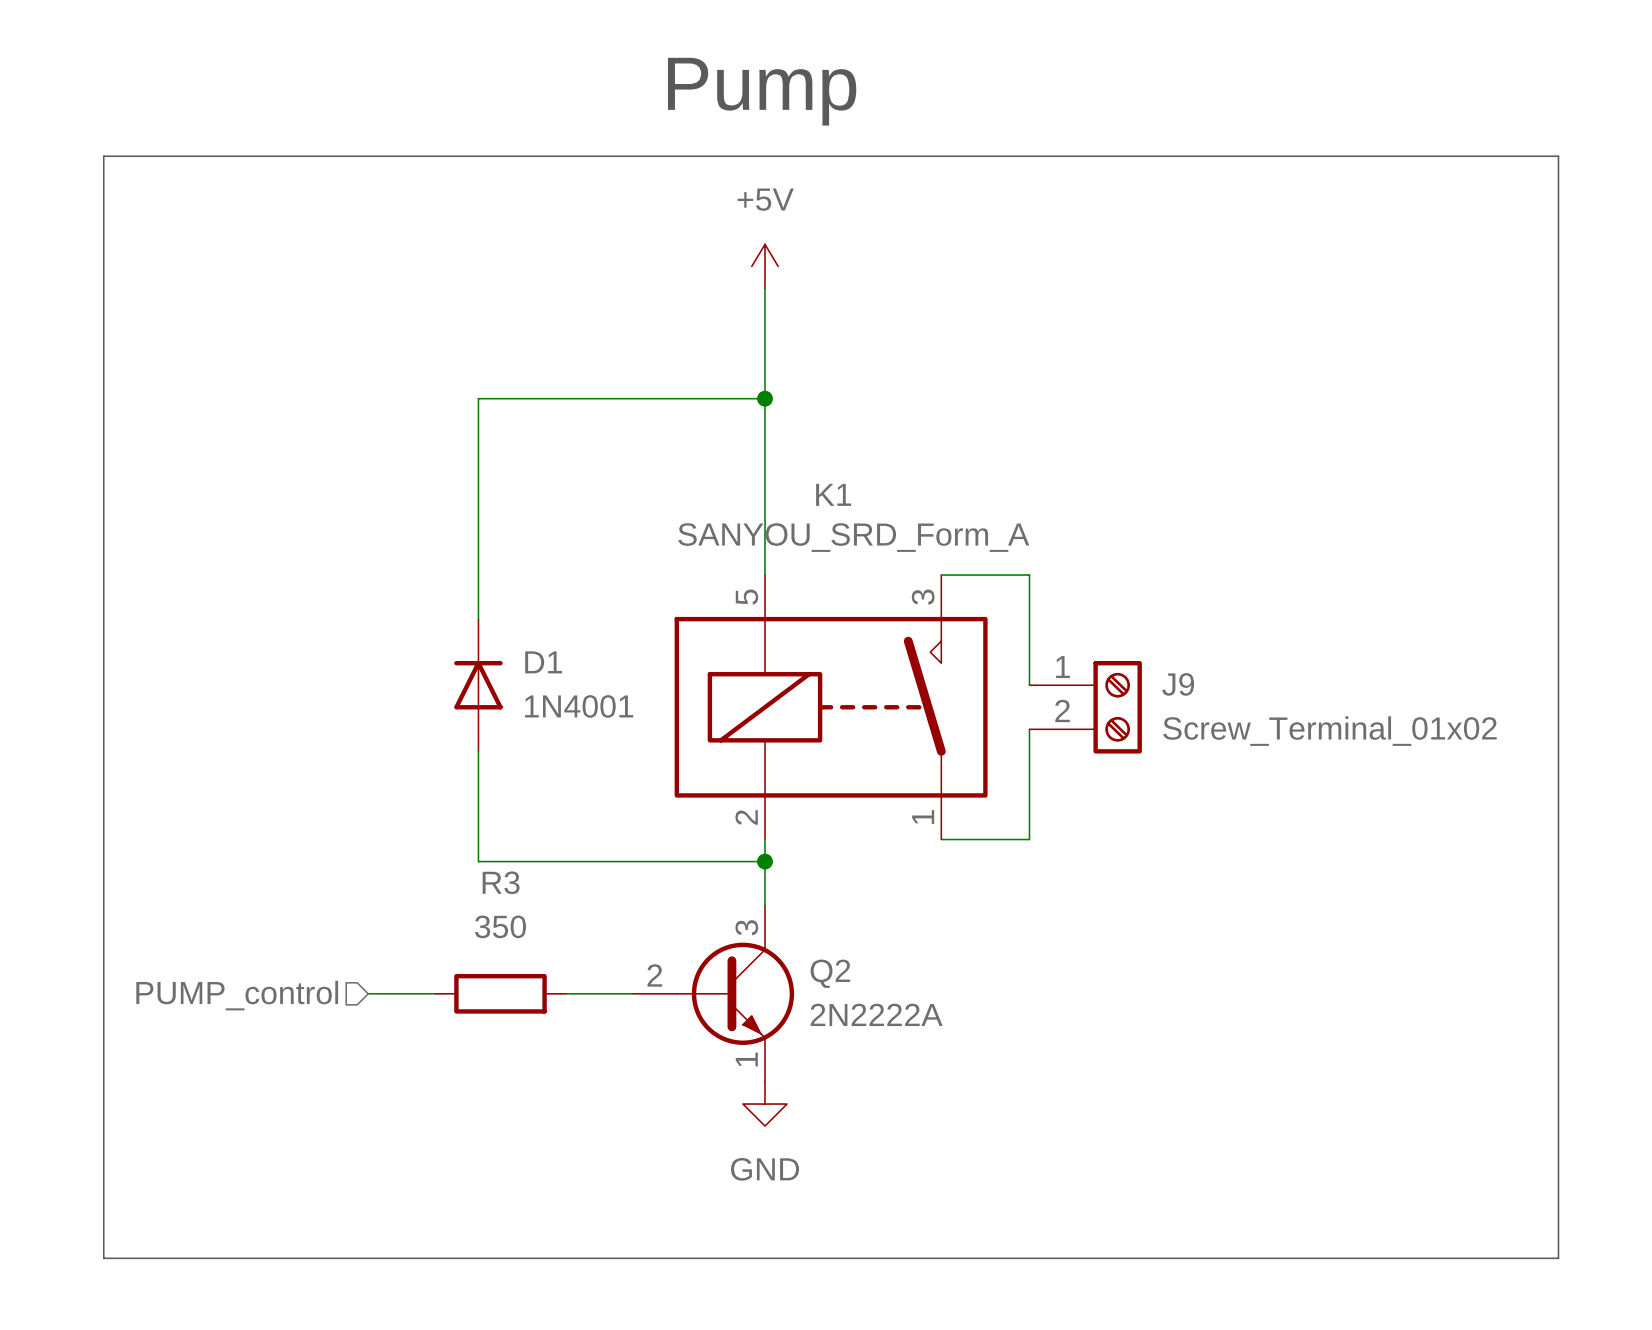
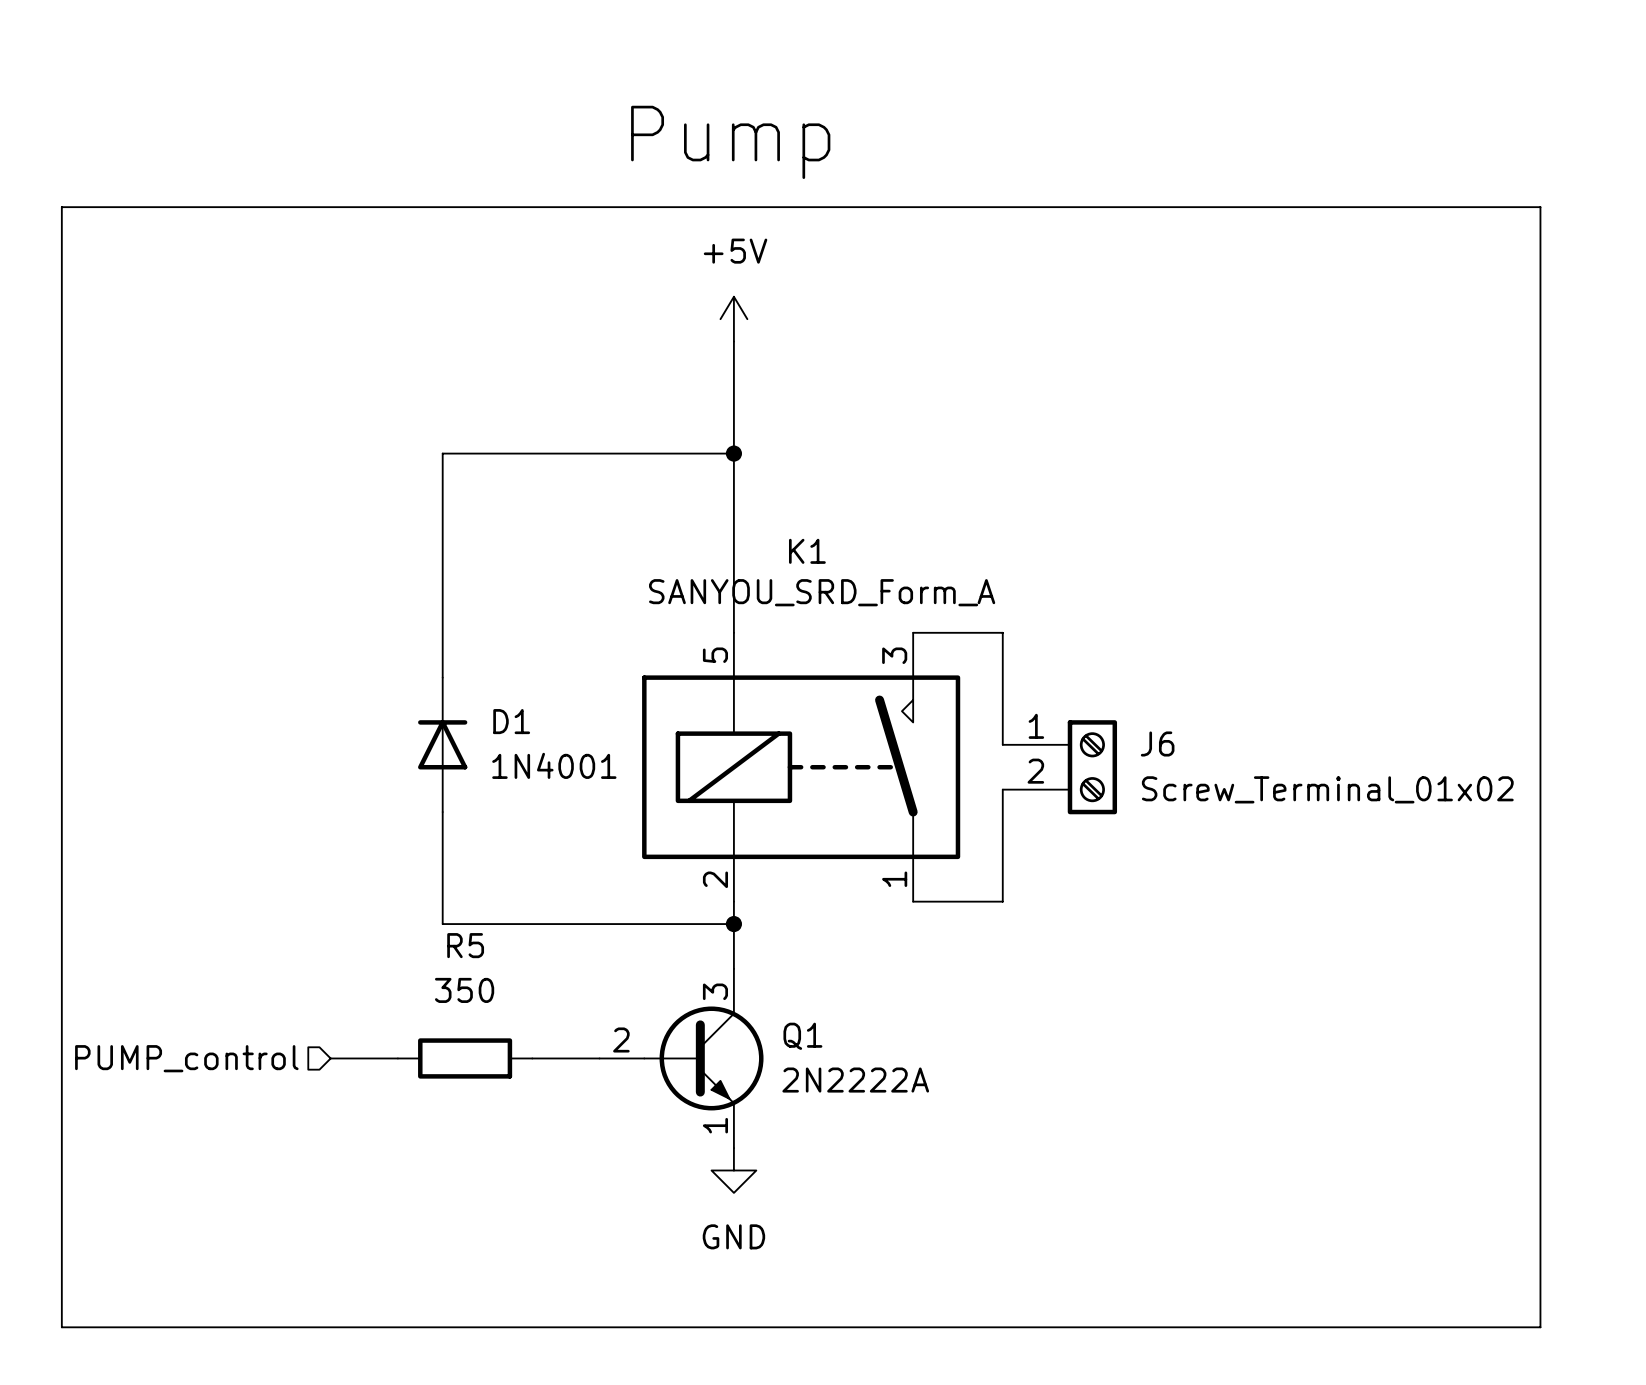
J9 name: J9 (1178, 684) -> J6 (1157, 743)
R3 name: R3 (501, 882) -> R5 (465, 945)
Q2 name: Q2 (830, 973) -> Q1 (802, 1036)

